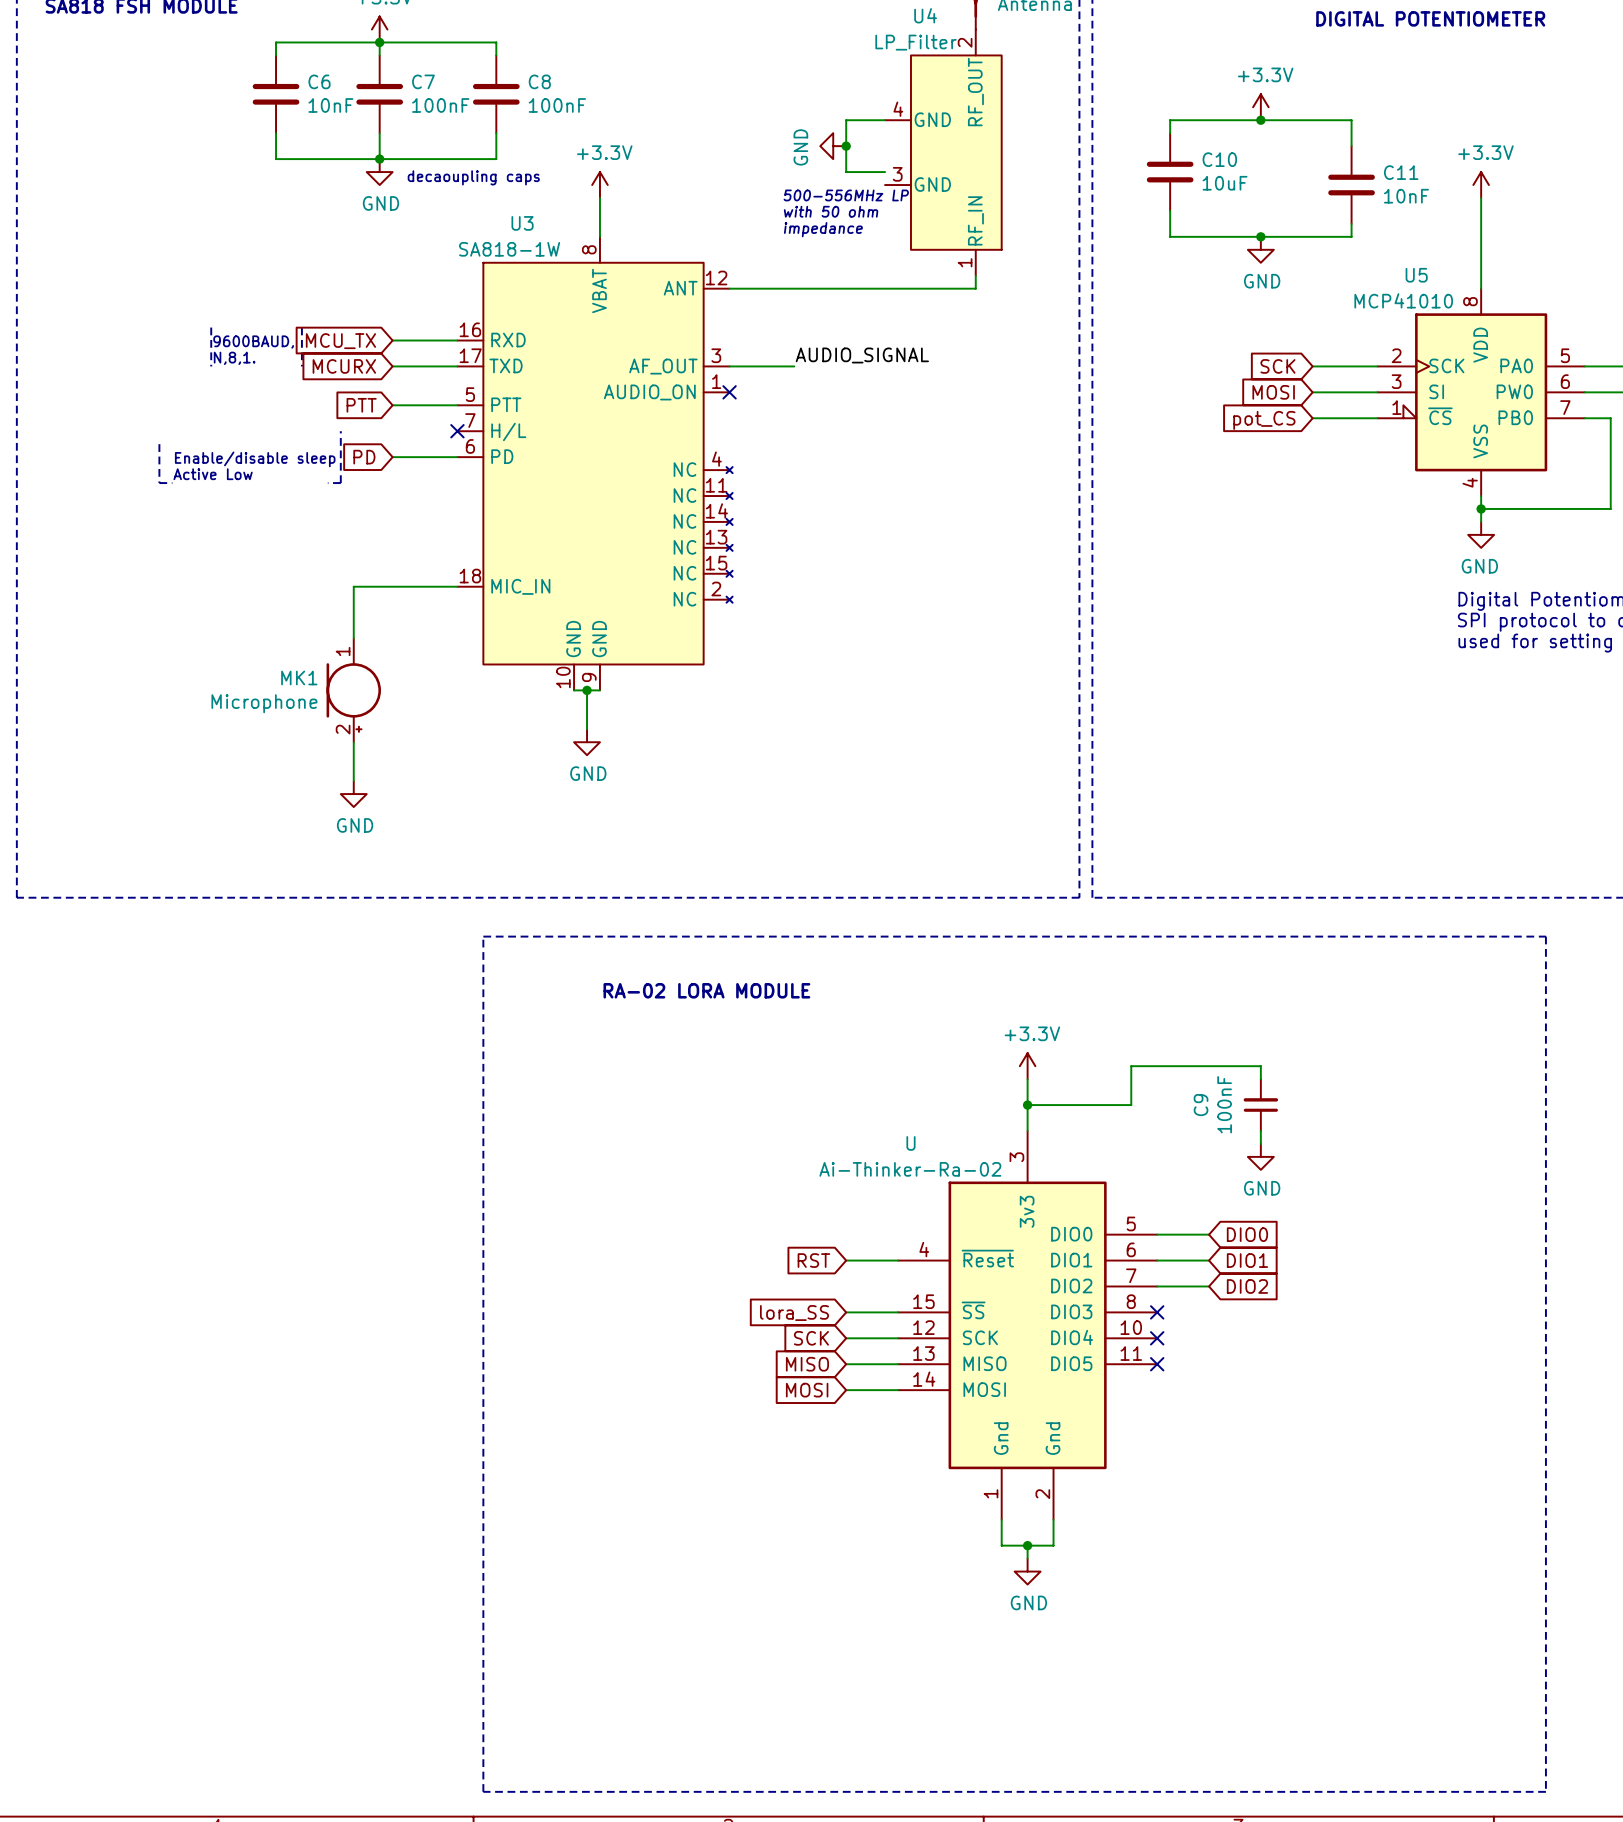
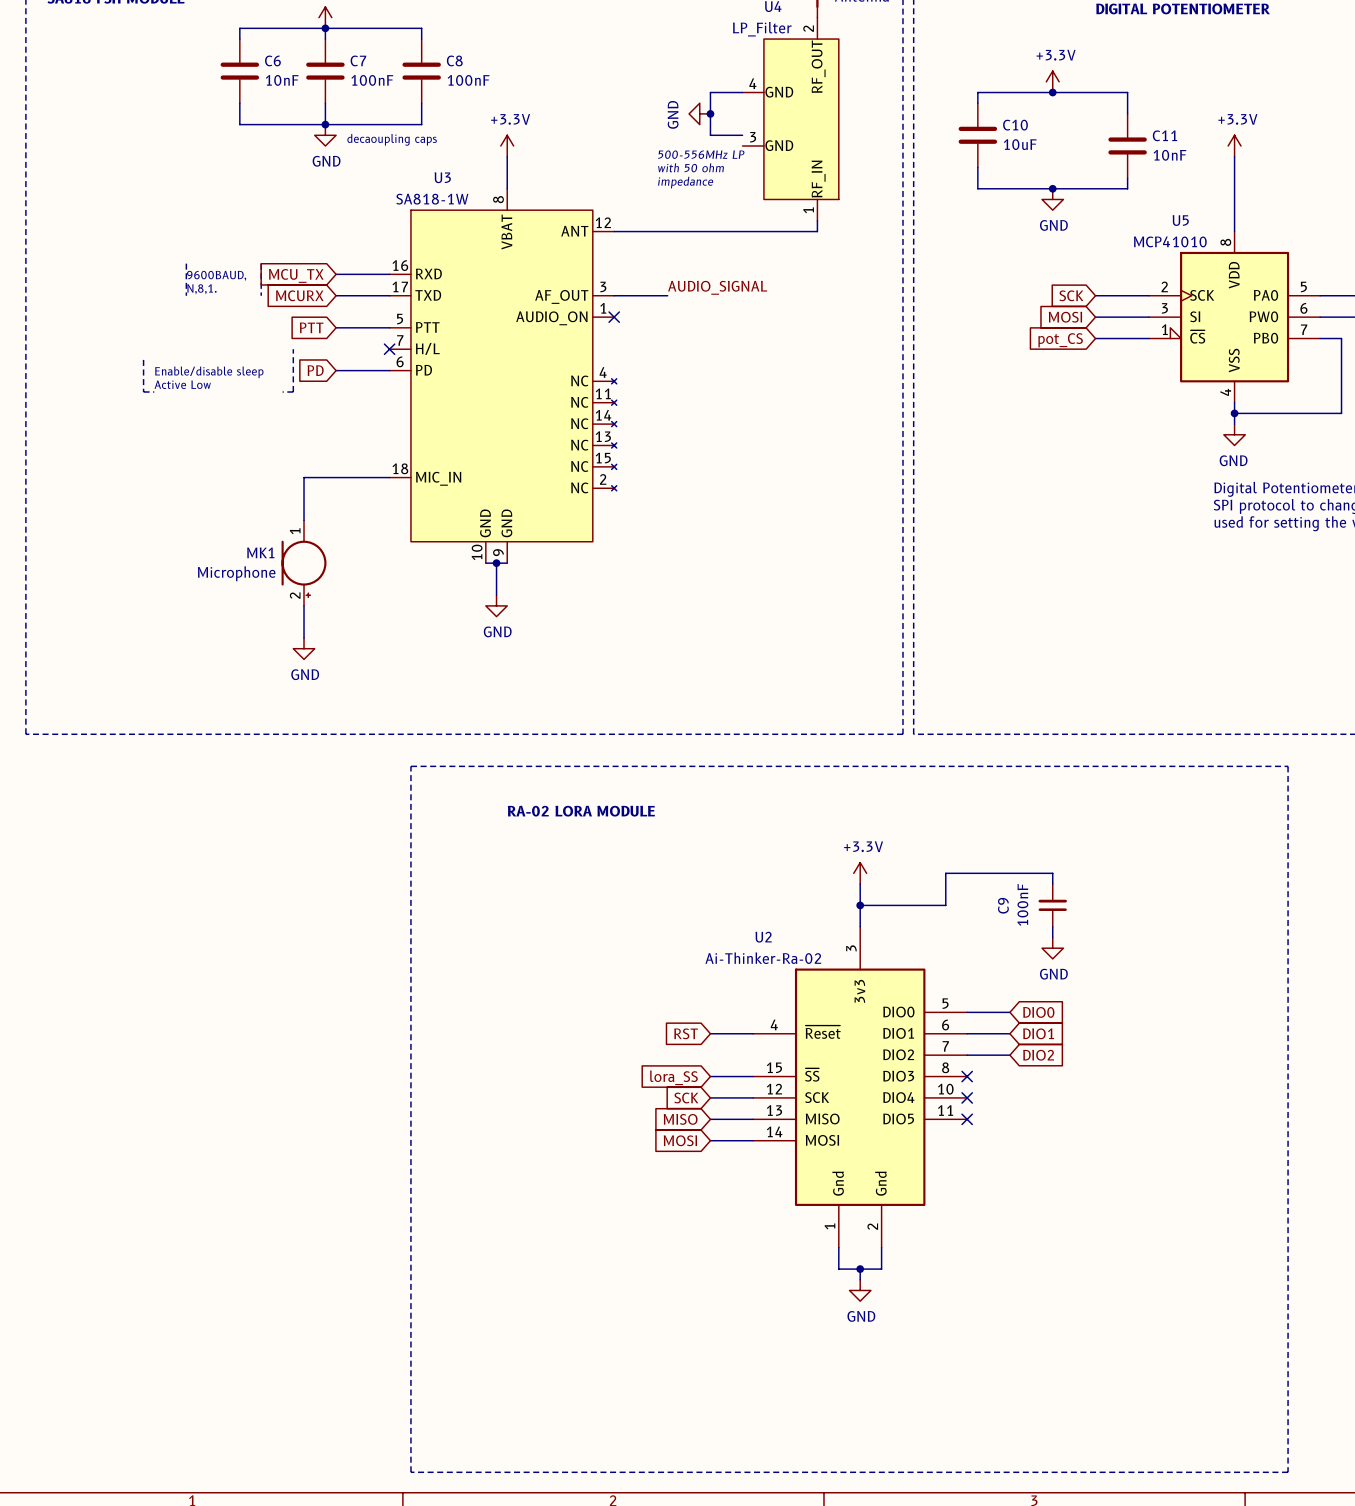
U name: U (910, 1143) -> U2 (763, 937)

